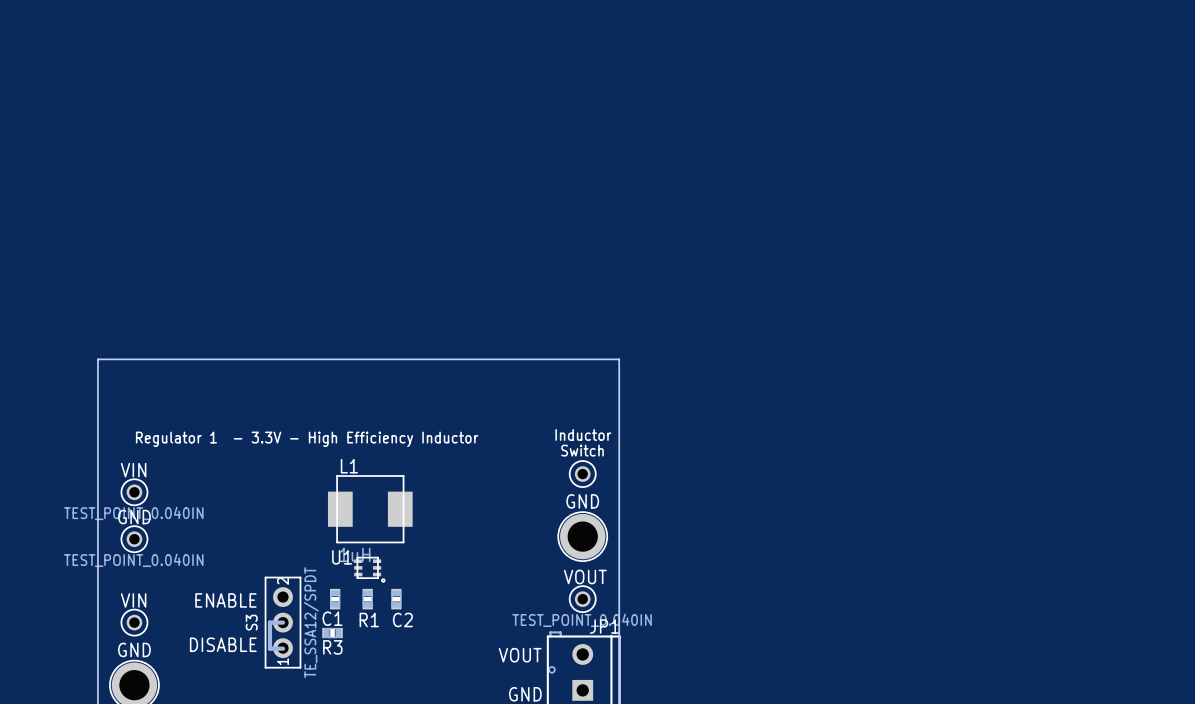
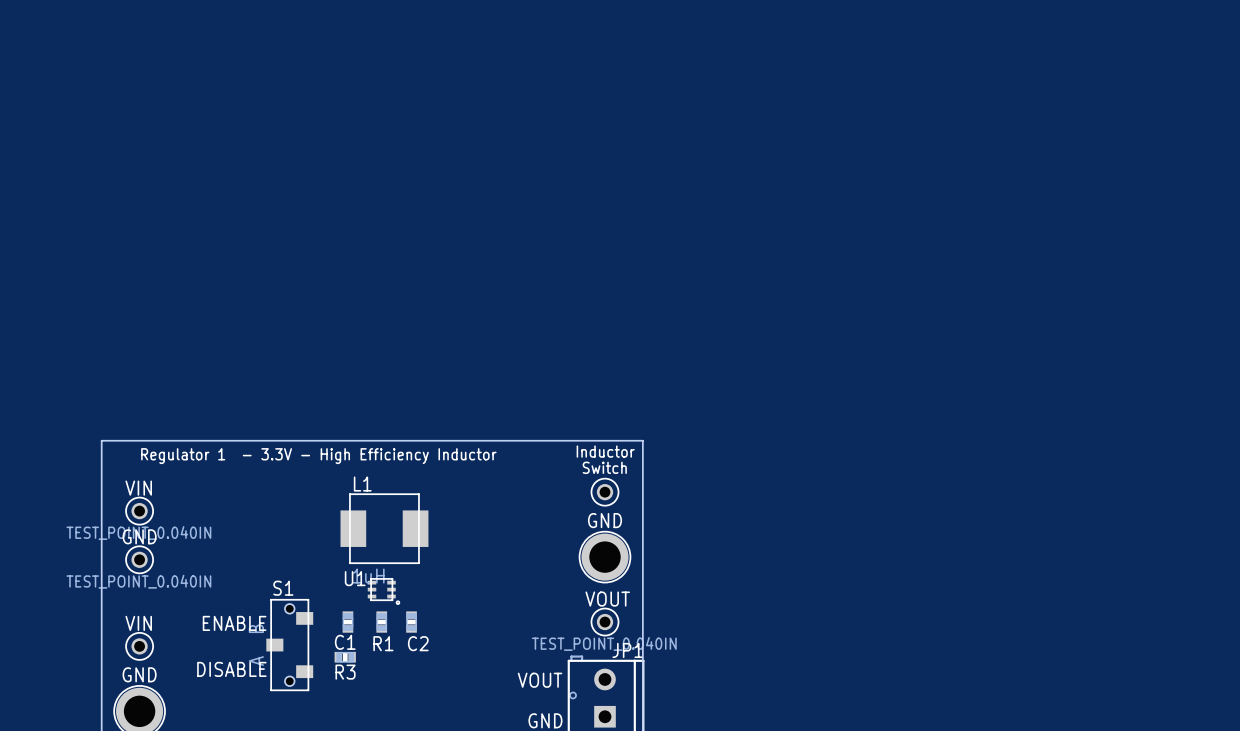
board edge: (97, 424) (97, 359) (619, 359) (619, 424) -> (101, 440) (642, 440)
S1: none -> (289, 645)
S3: TE_SSA12/SPDT (283, 622) -> none

